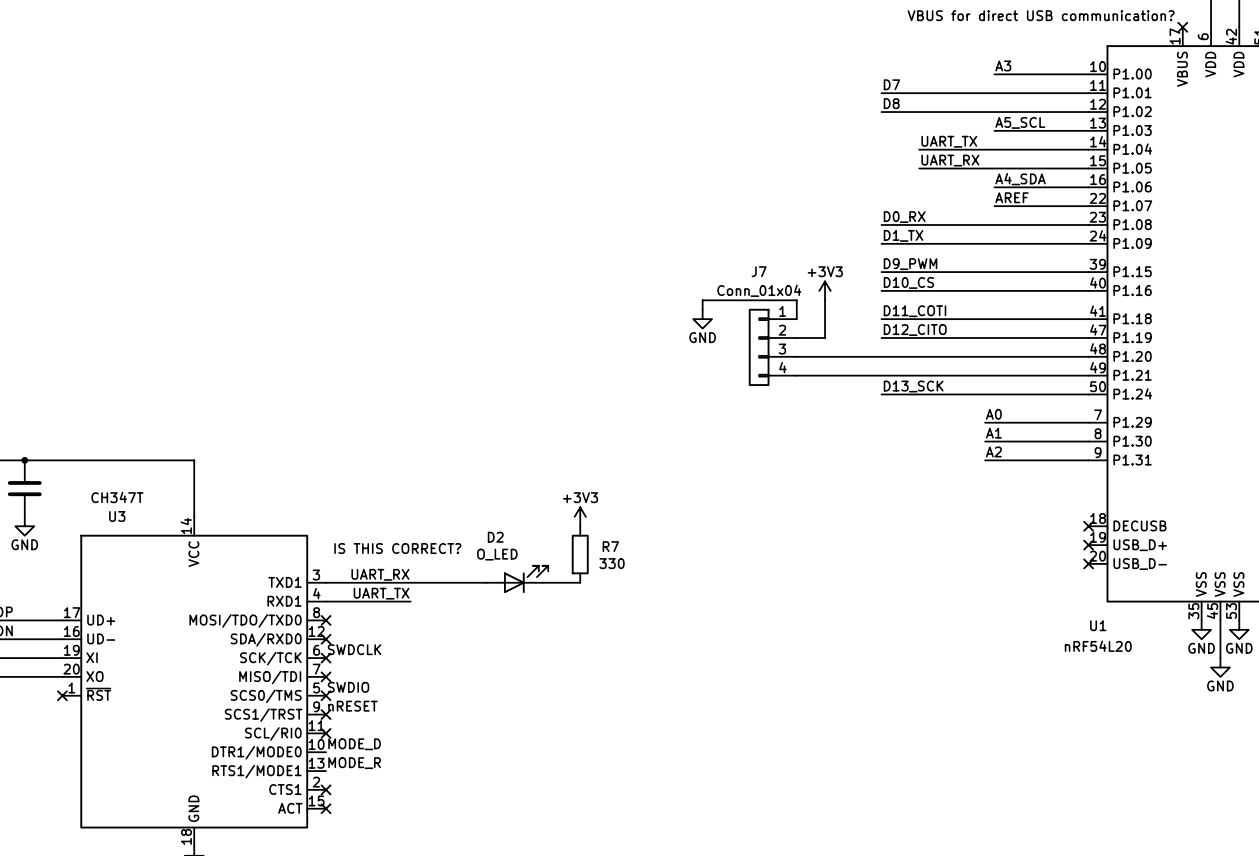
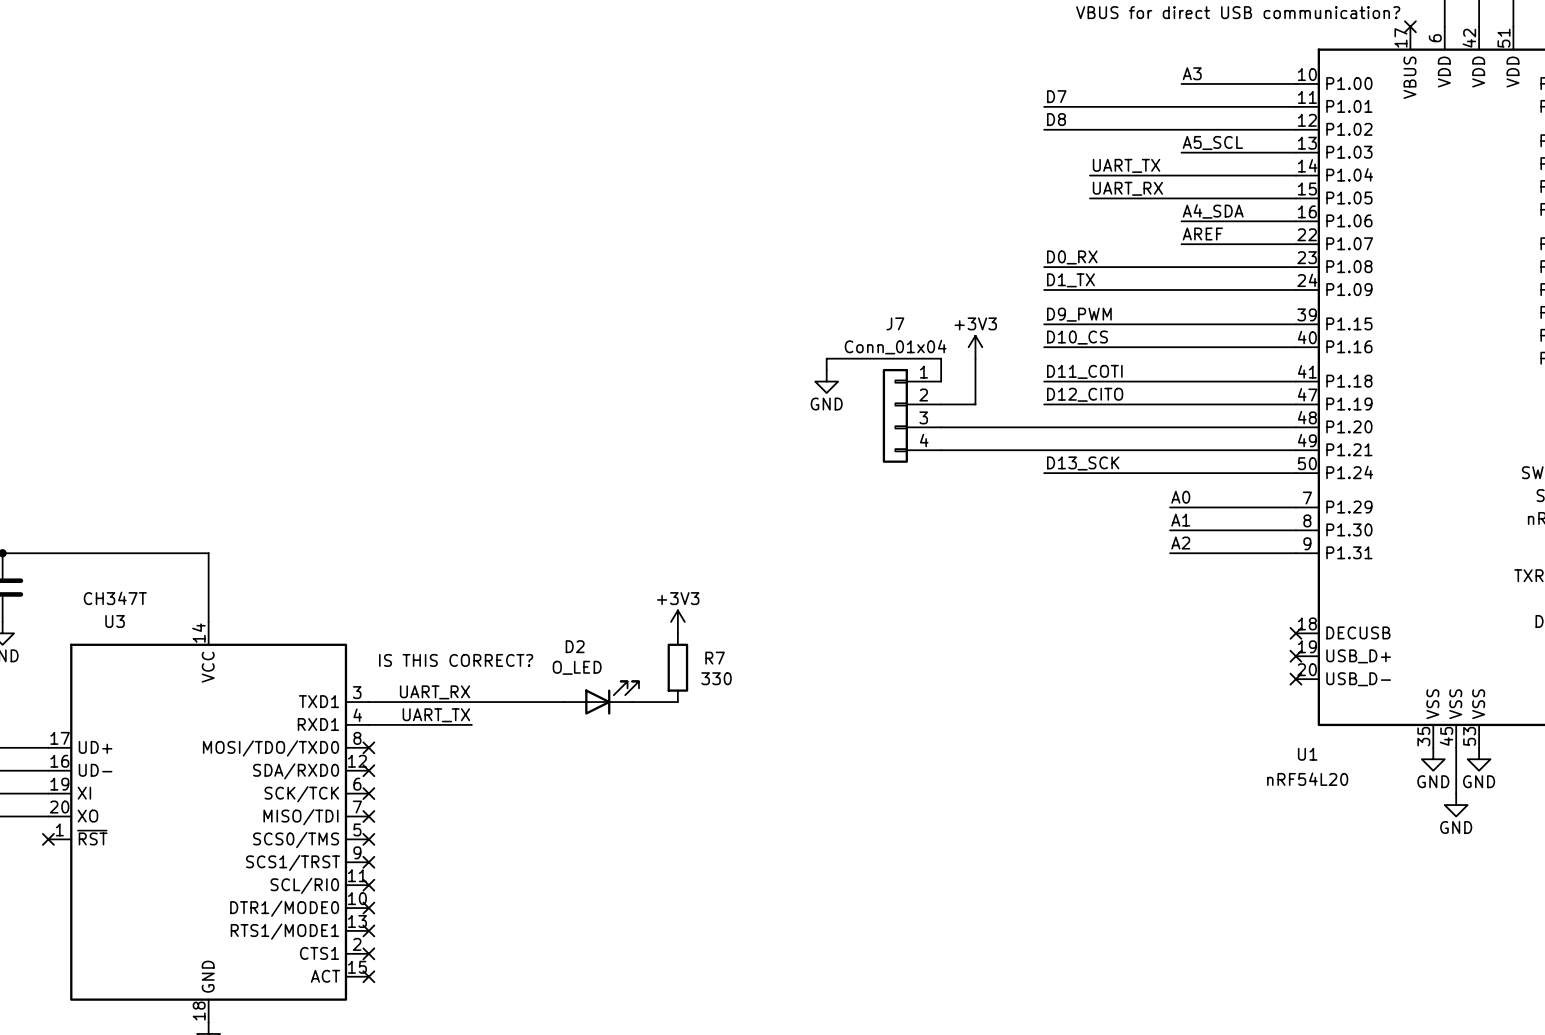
label: SWDCLK (354, 649) -> none
label: SWDIO (348, 687) -> none
label: nRESET (353, 706) -> none
label: MODE_D (354, 744) -> none
no-connect mark: none -> (368, 908)
label: MODE_R (354, 763) -> none
no-connect mark: none -> (368, 930)

